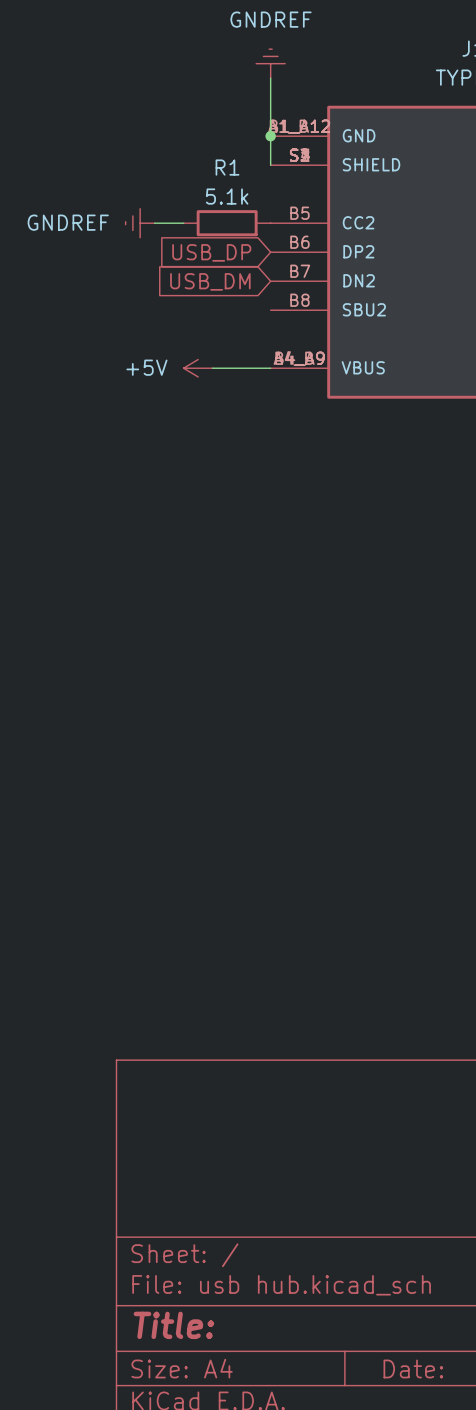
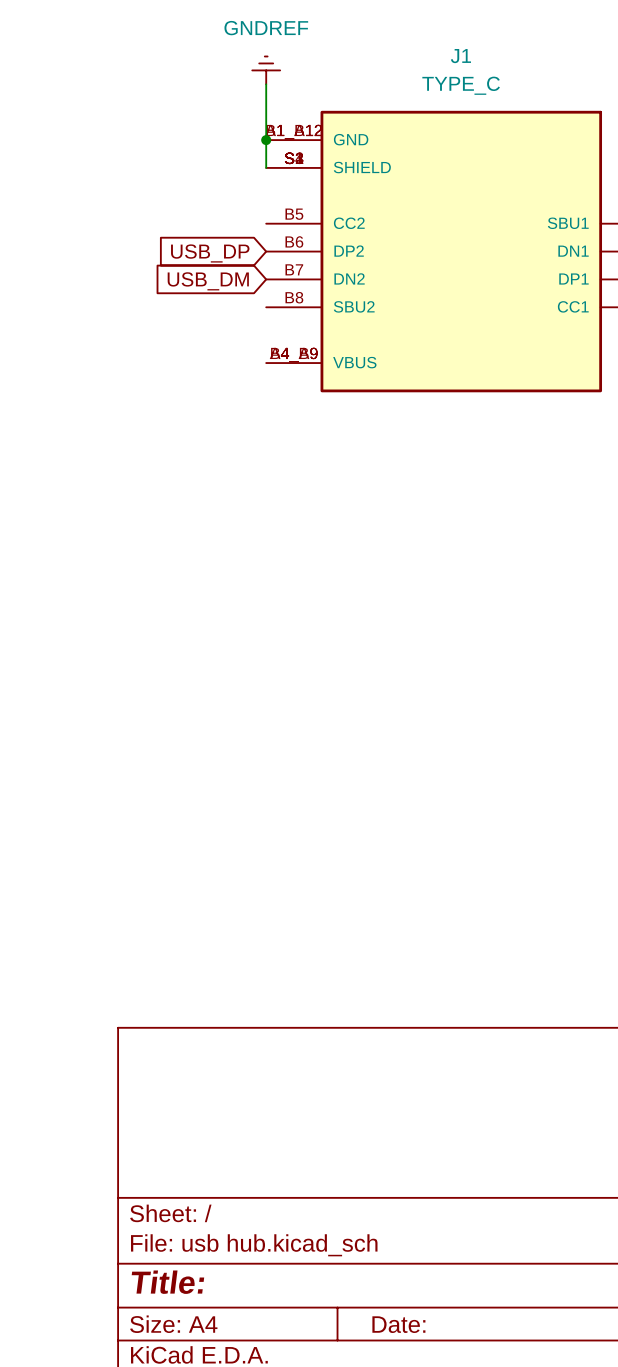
power symbol: GNDREF (140, 223) -> none
wire: (154, 223) (183, 223) -> none
R1: 5.1k (227, 223) -> none
power symbol: +5V (198, 368) -> none
wire: (212, 368) (270, 368) -> none

